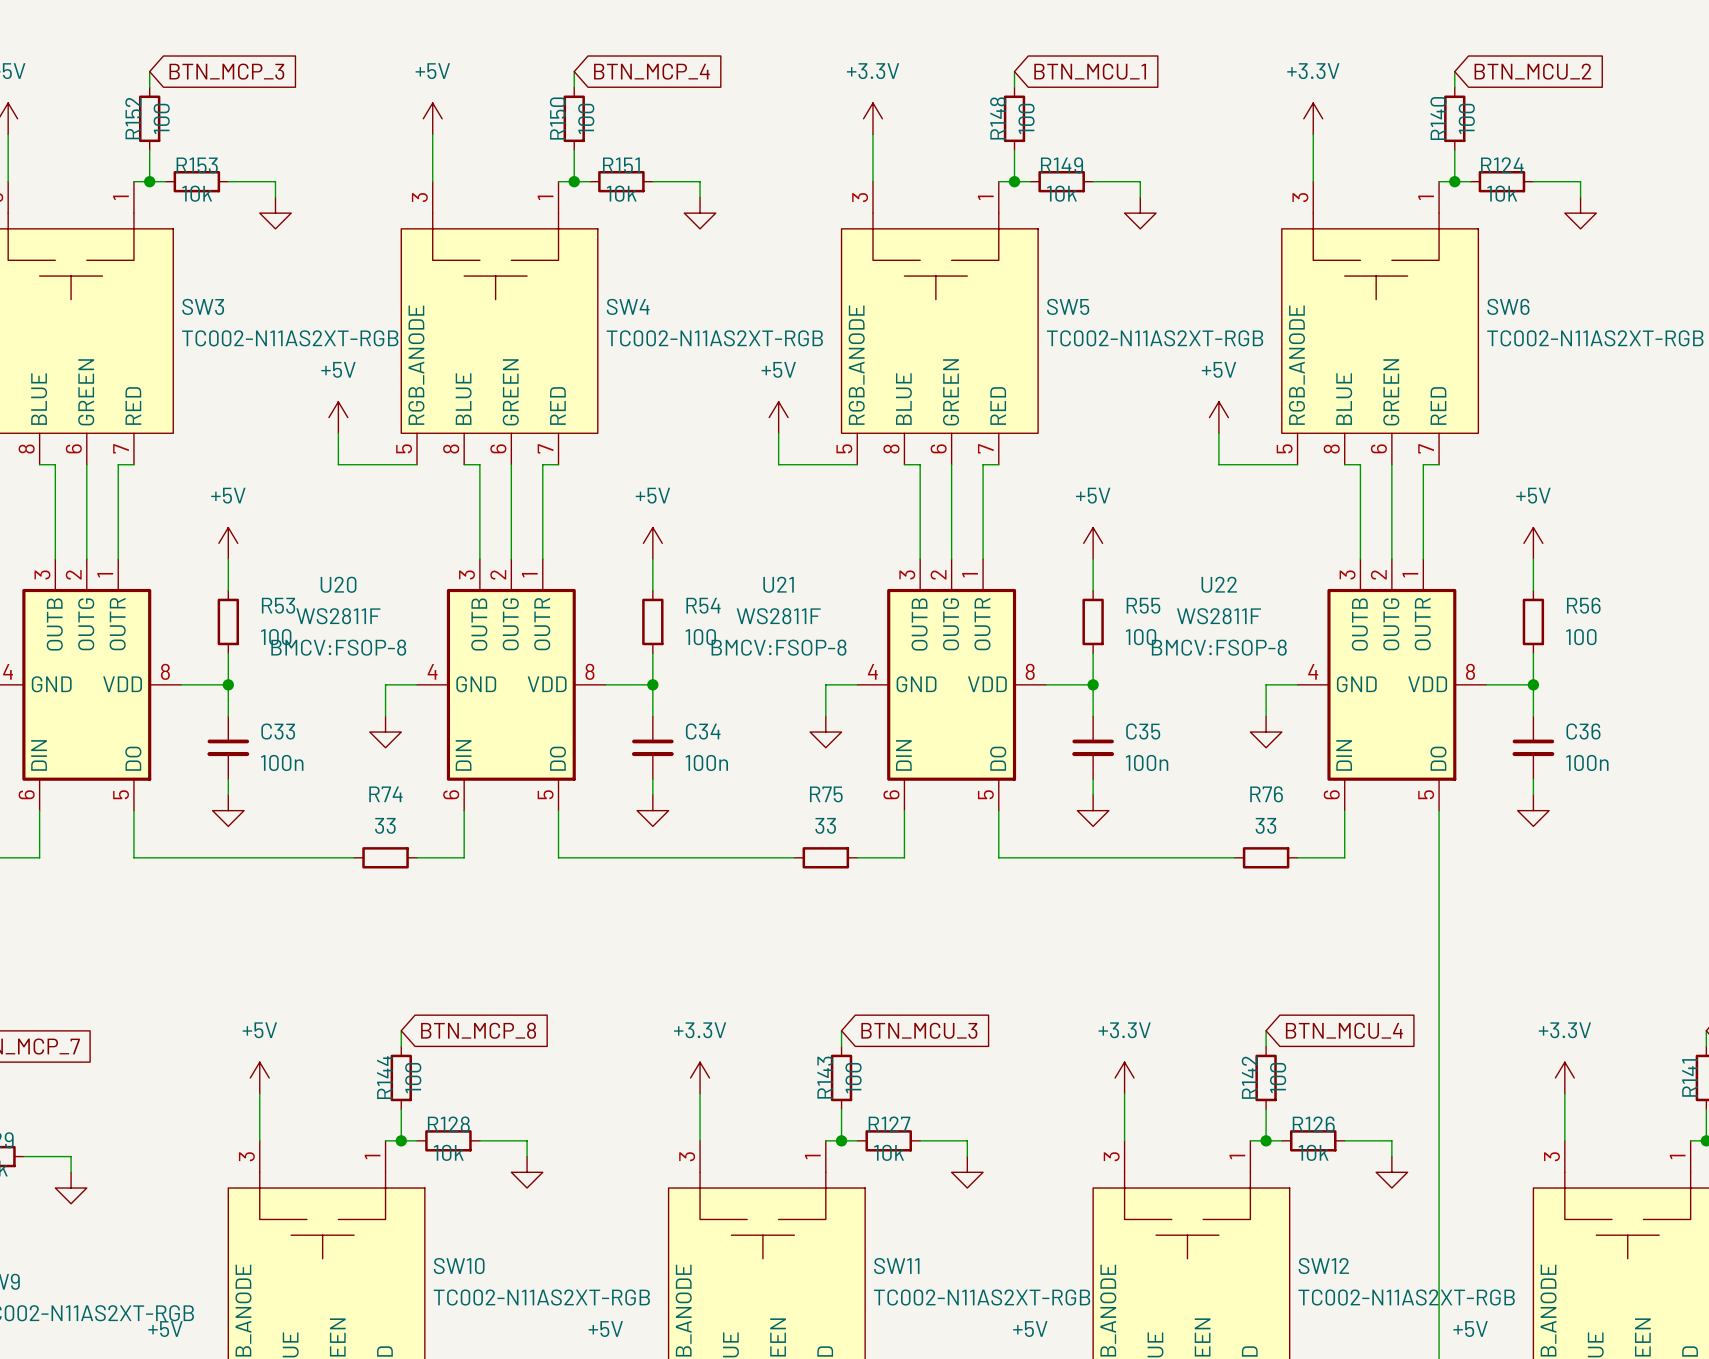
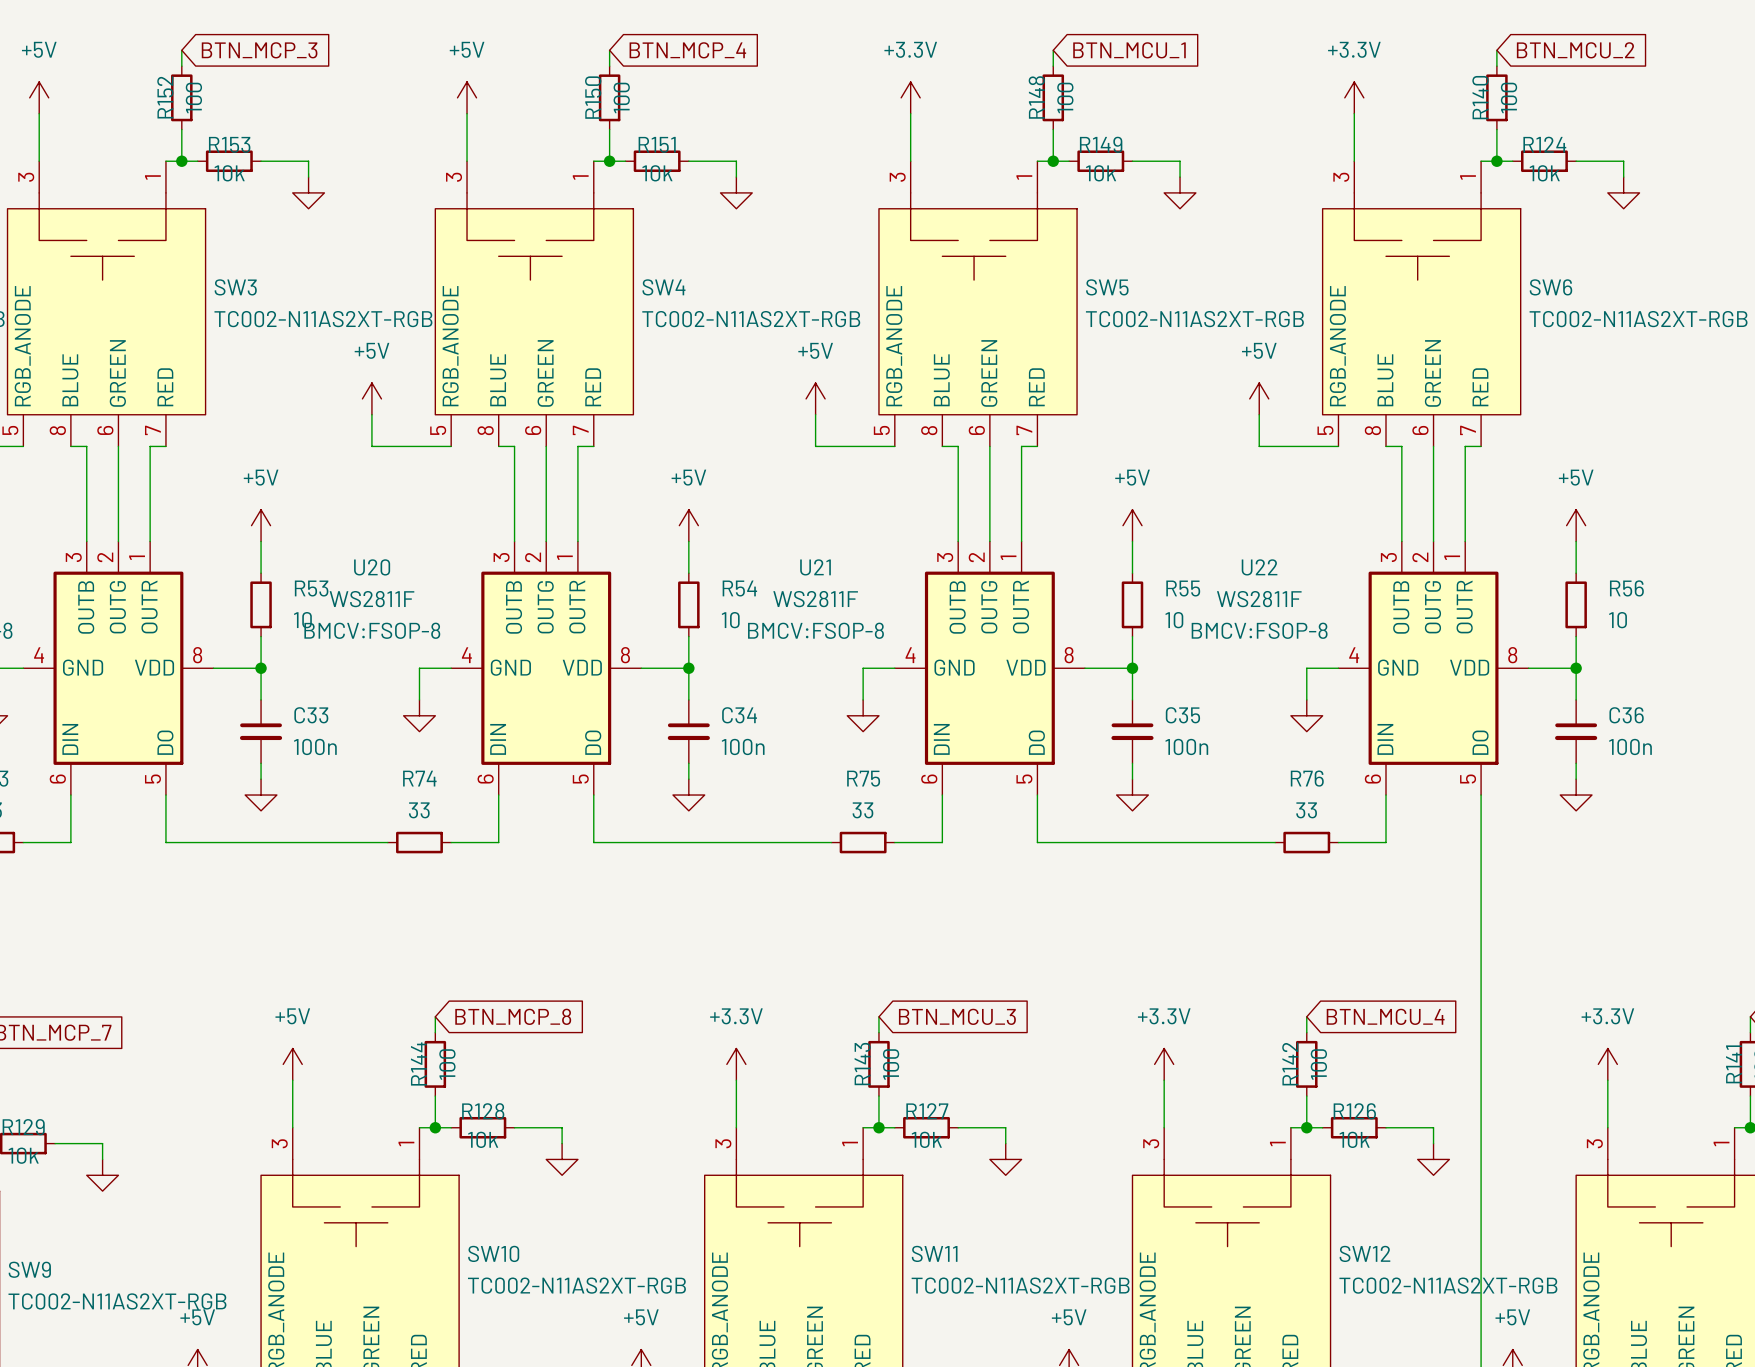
R53 value: 100 (276, 637) -> 10 (302, 620)
R54 value: 100 (700, 637) -> 10 (730, 620)
R55 value: 100 (1141, 637) -> 10 (1174, 620)
R56 value: 100 (1581, 637) -> 10 (1618, 620)

